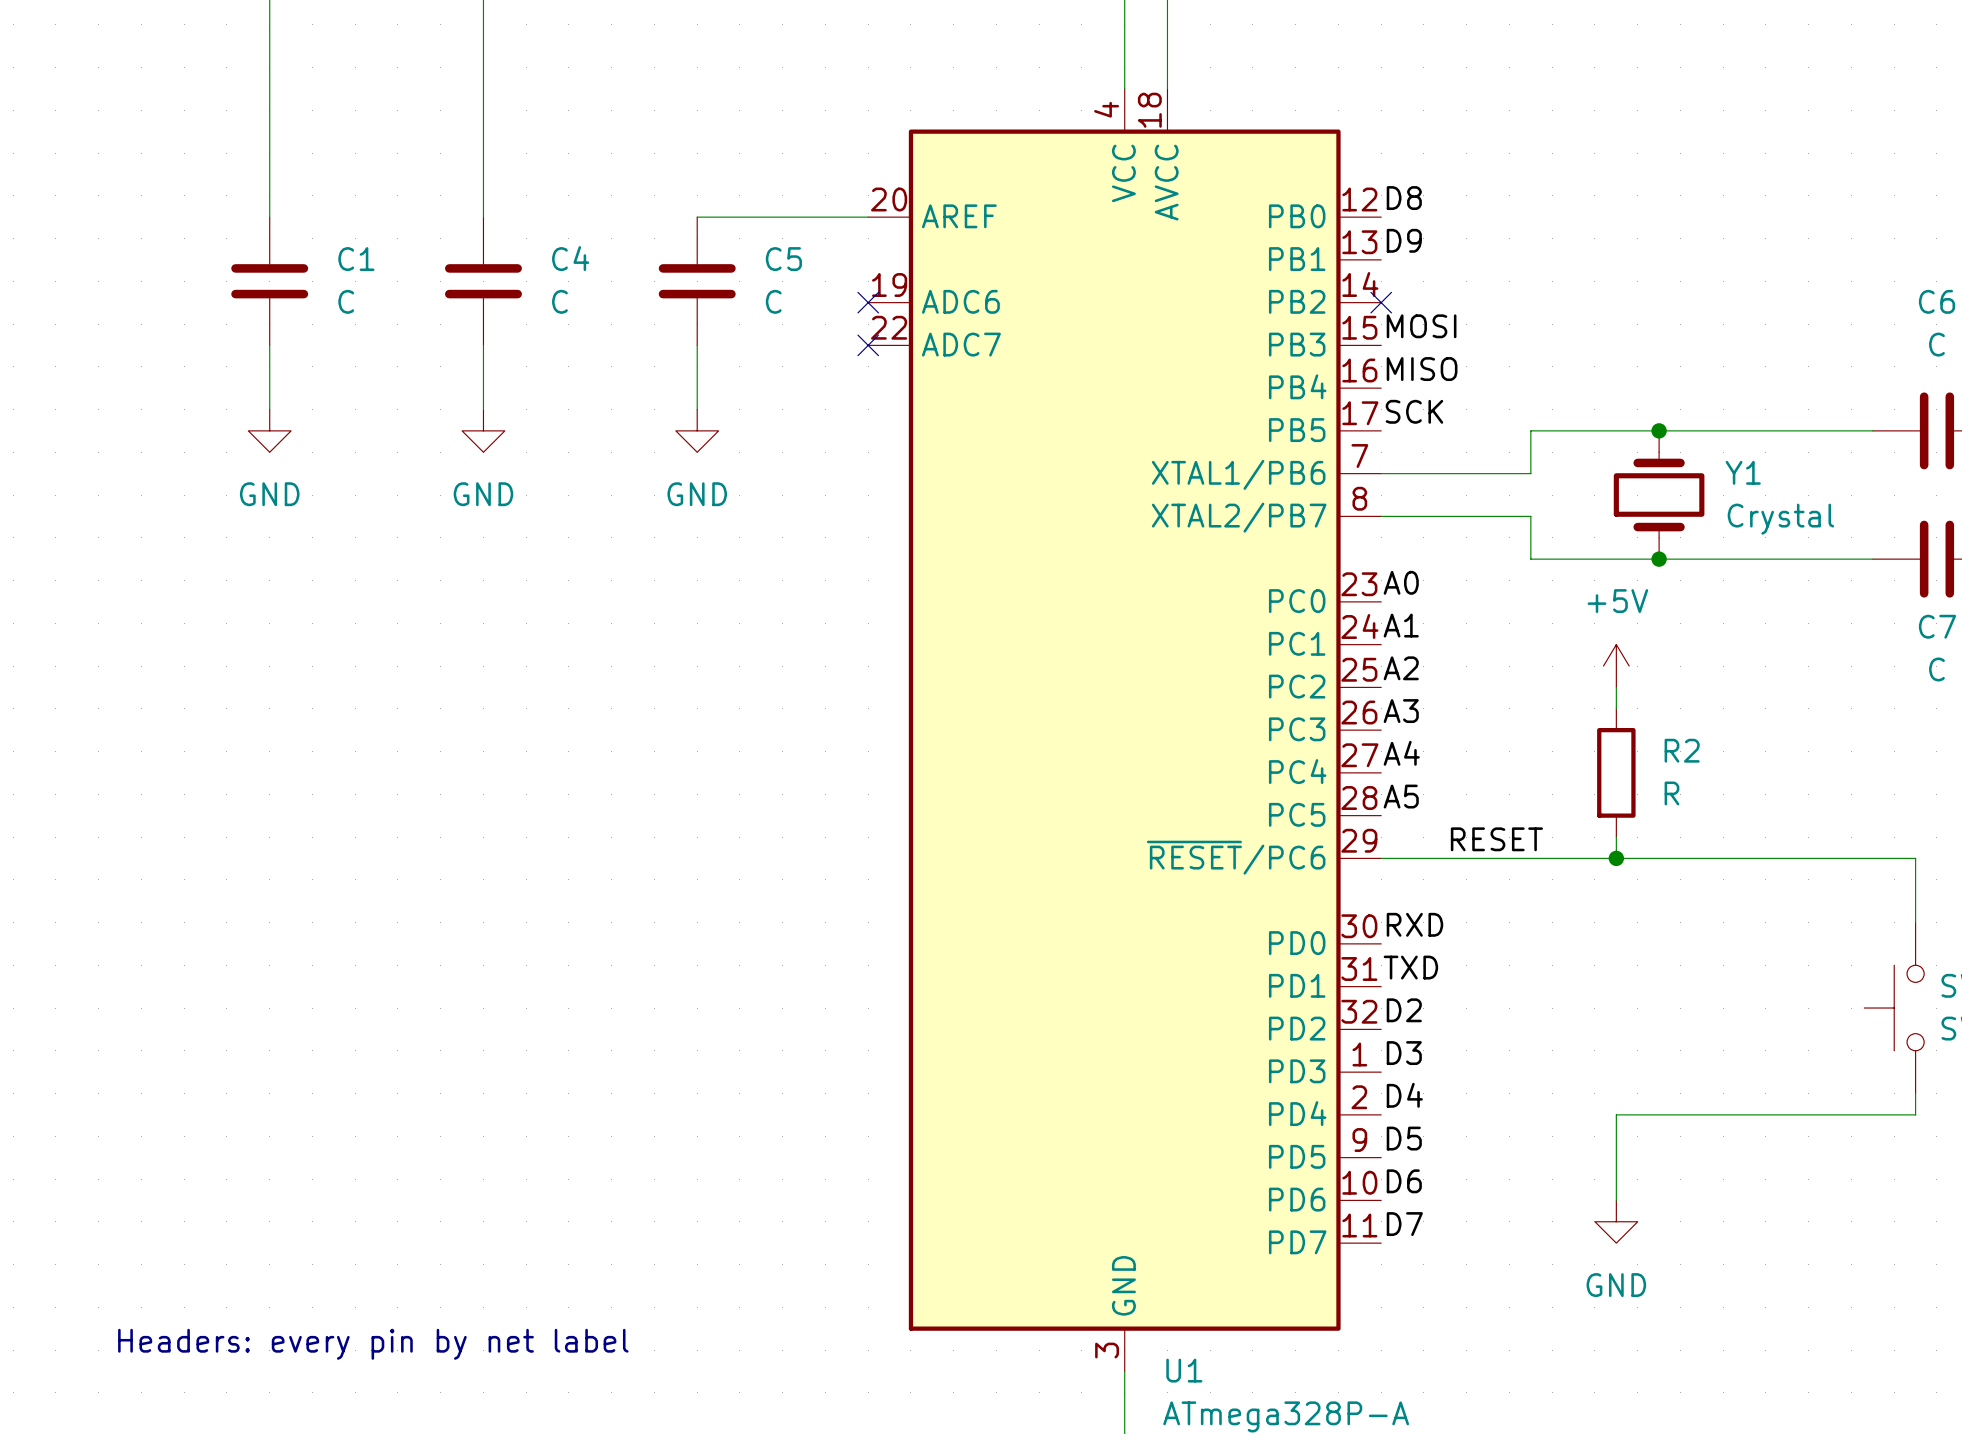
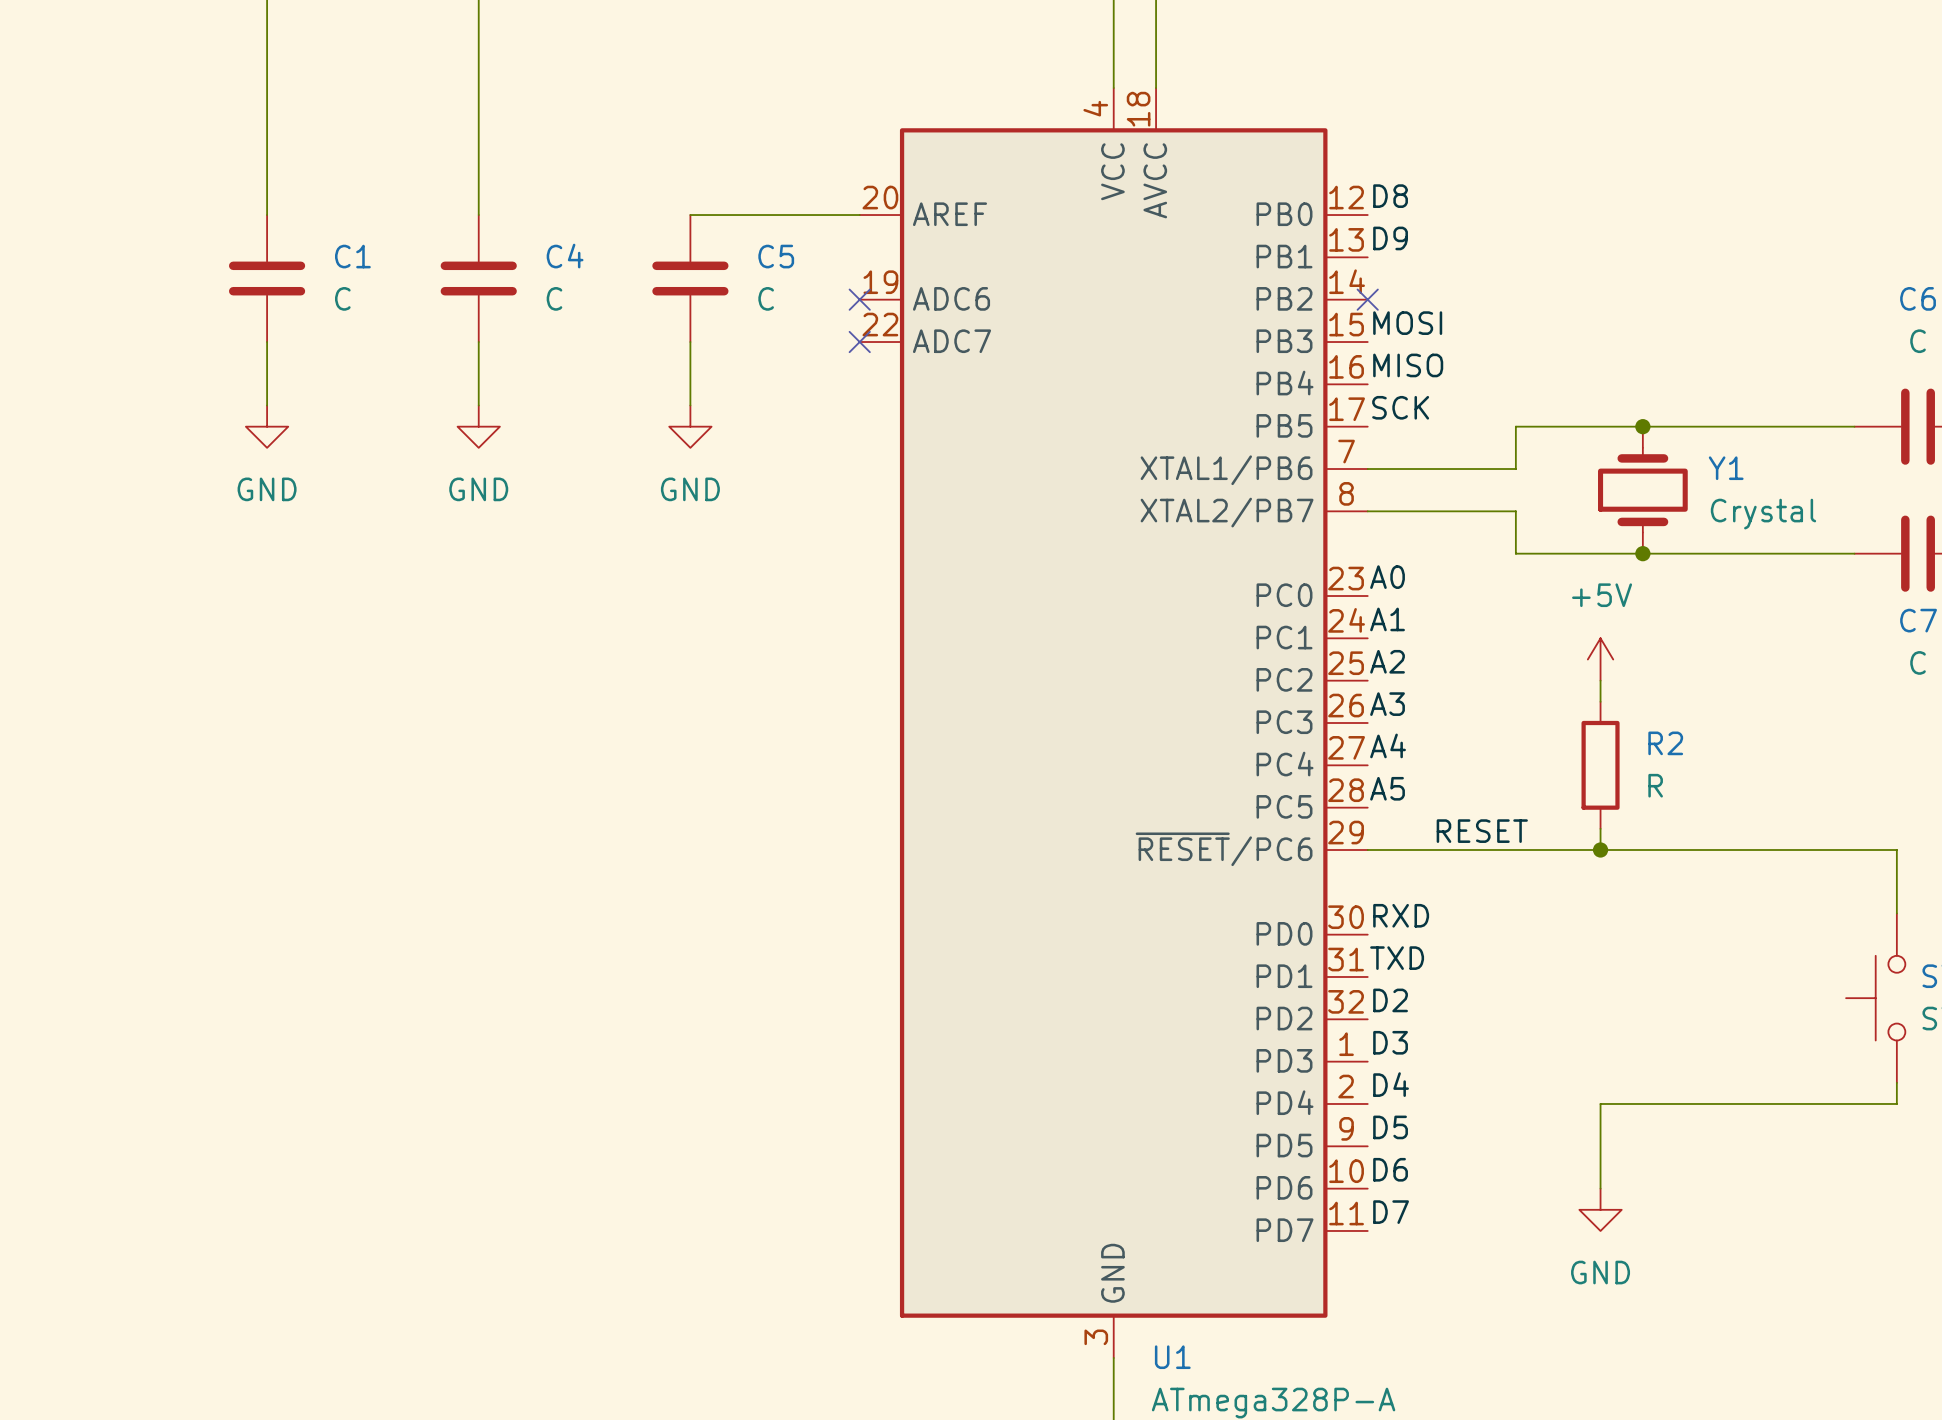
text: Headers: every pin by net label (373, 1344) -> none

